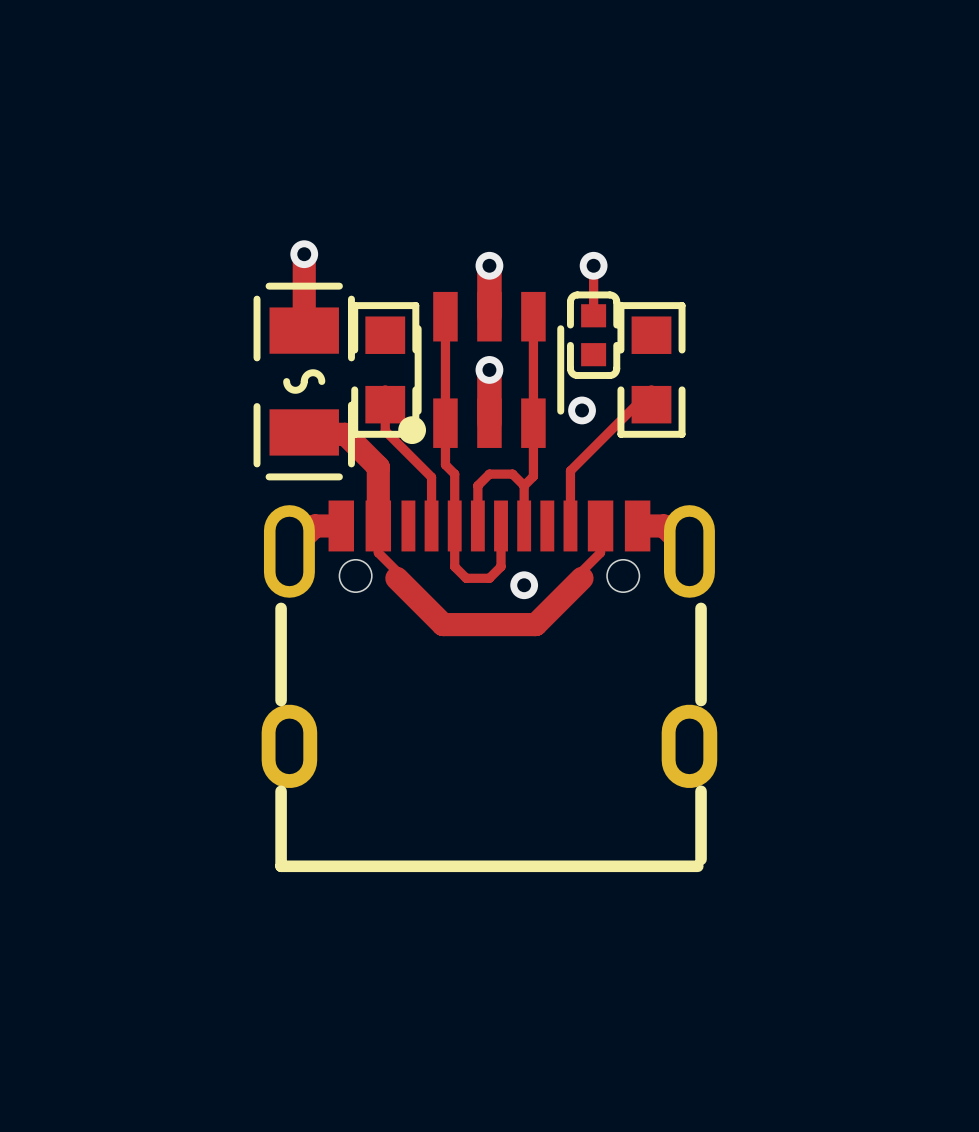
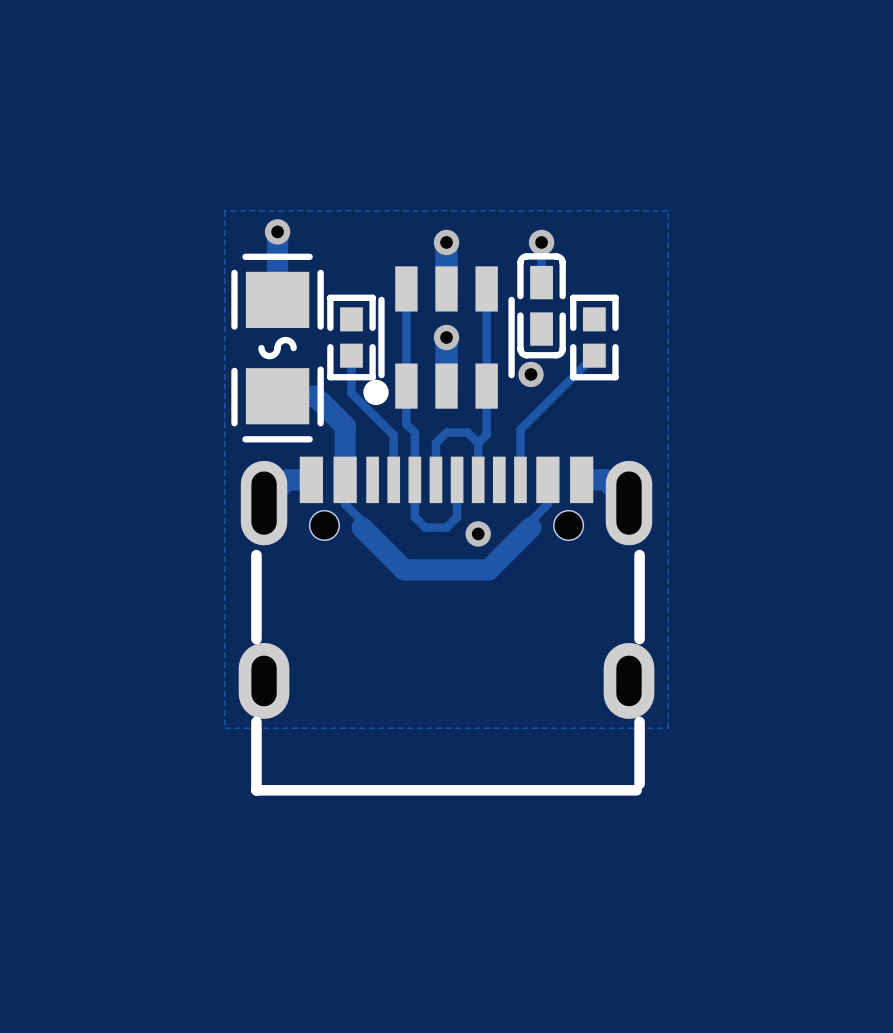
zone outline: none -> (224, 210) (668, 210) (668, 728) (224, 728) (224, 210)
part footprint: [253, 282, 355, 481] -> [231, 253, 324, 443]
part footprint: [566, 291, 621, 379] -> [517, 253, 566, 359]
part footprint: [351, 302, 420, 438] -> [327, 294, 376, 381]
part footprint: [617, 302, 686, 438] -> [570, 294, 619, 381]

